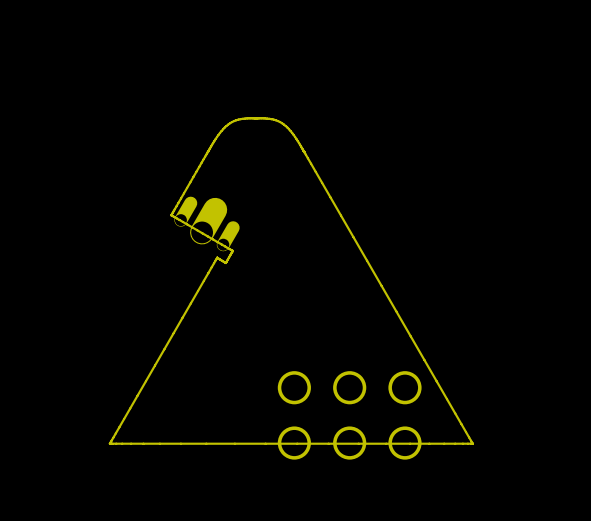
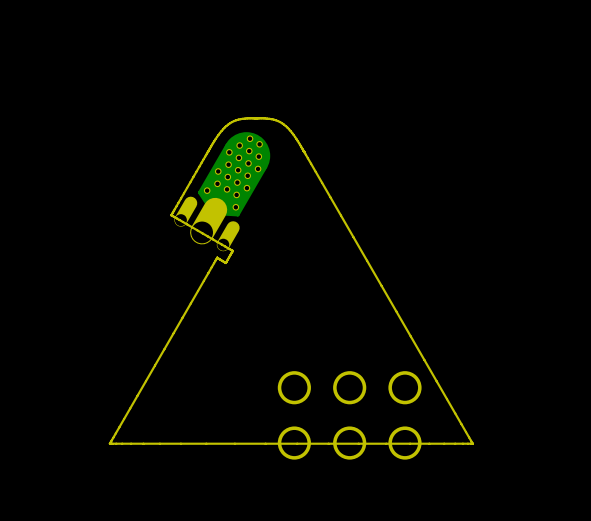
part: none -> (222, 191)
part: (207, 223) -> none

